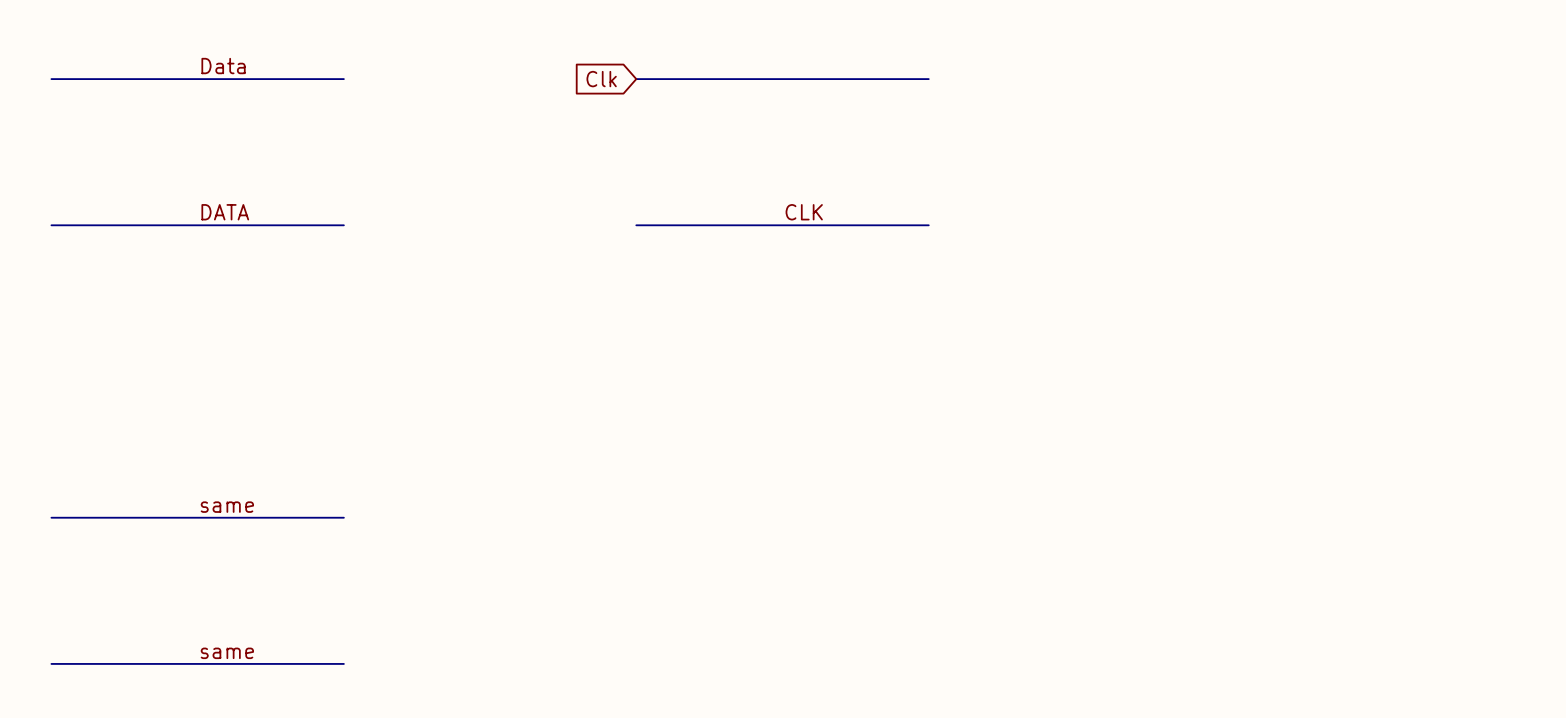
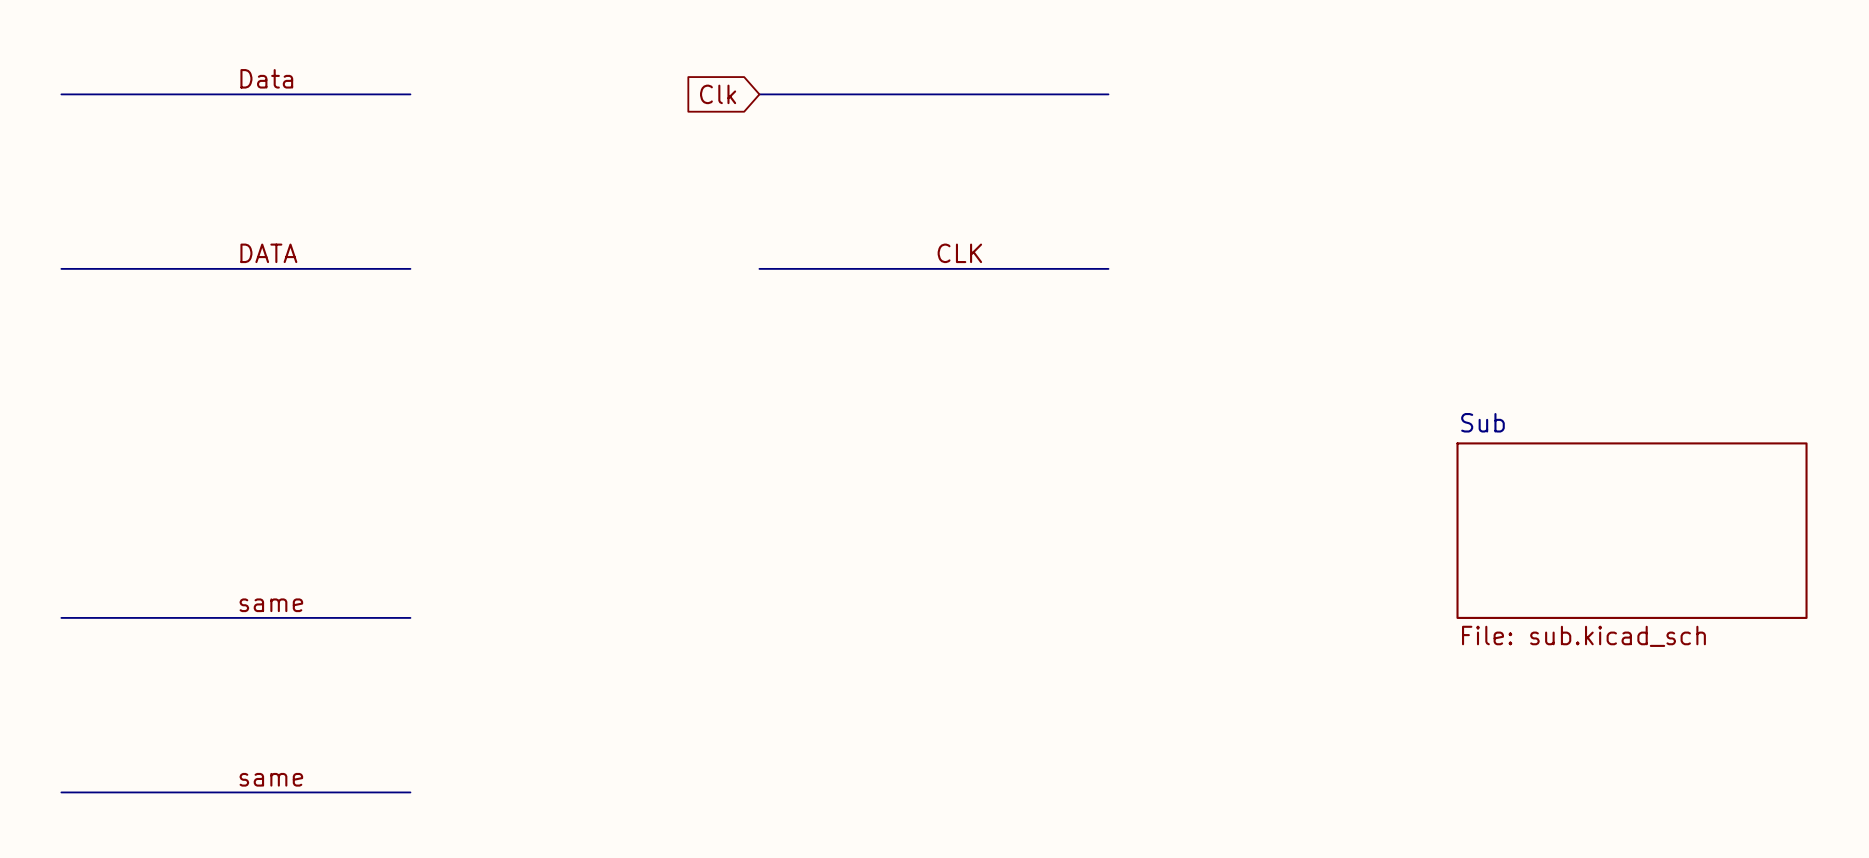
sheet Sub: none -> File: sub.kicad_sch (1632, 530)

